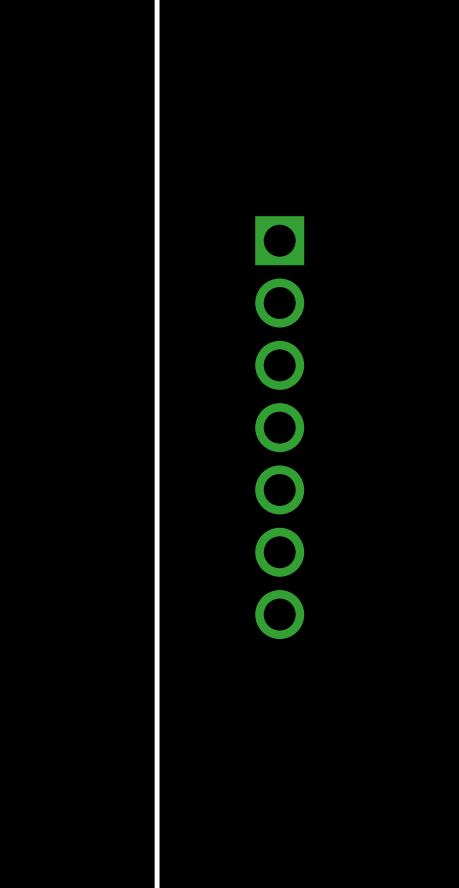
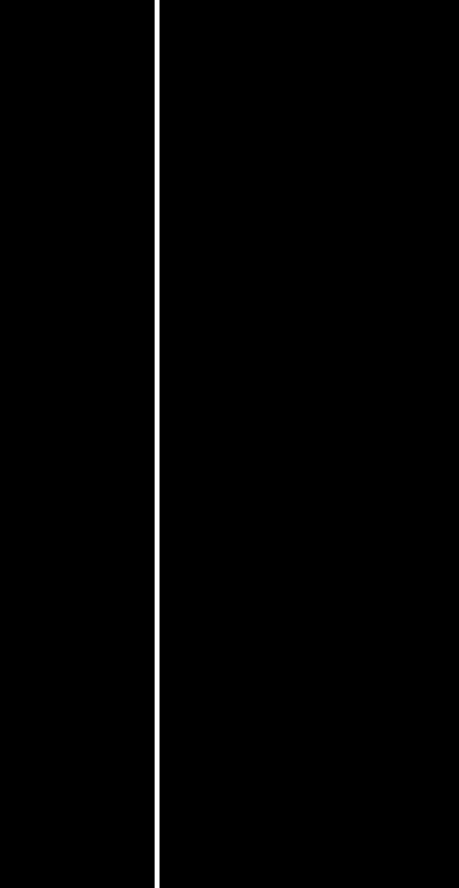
part: (279, 427) -> none

